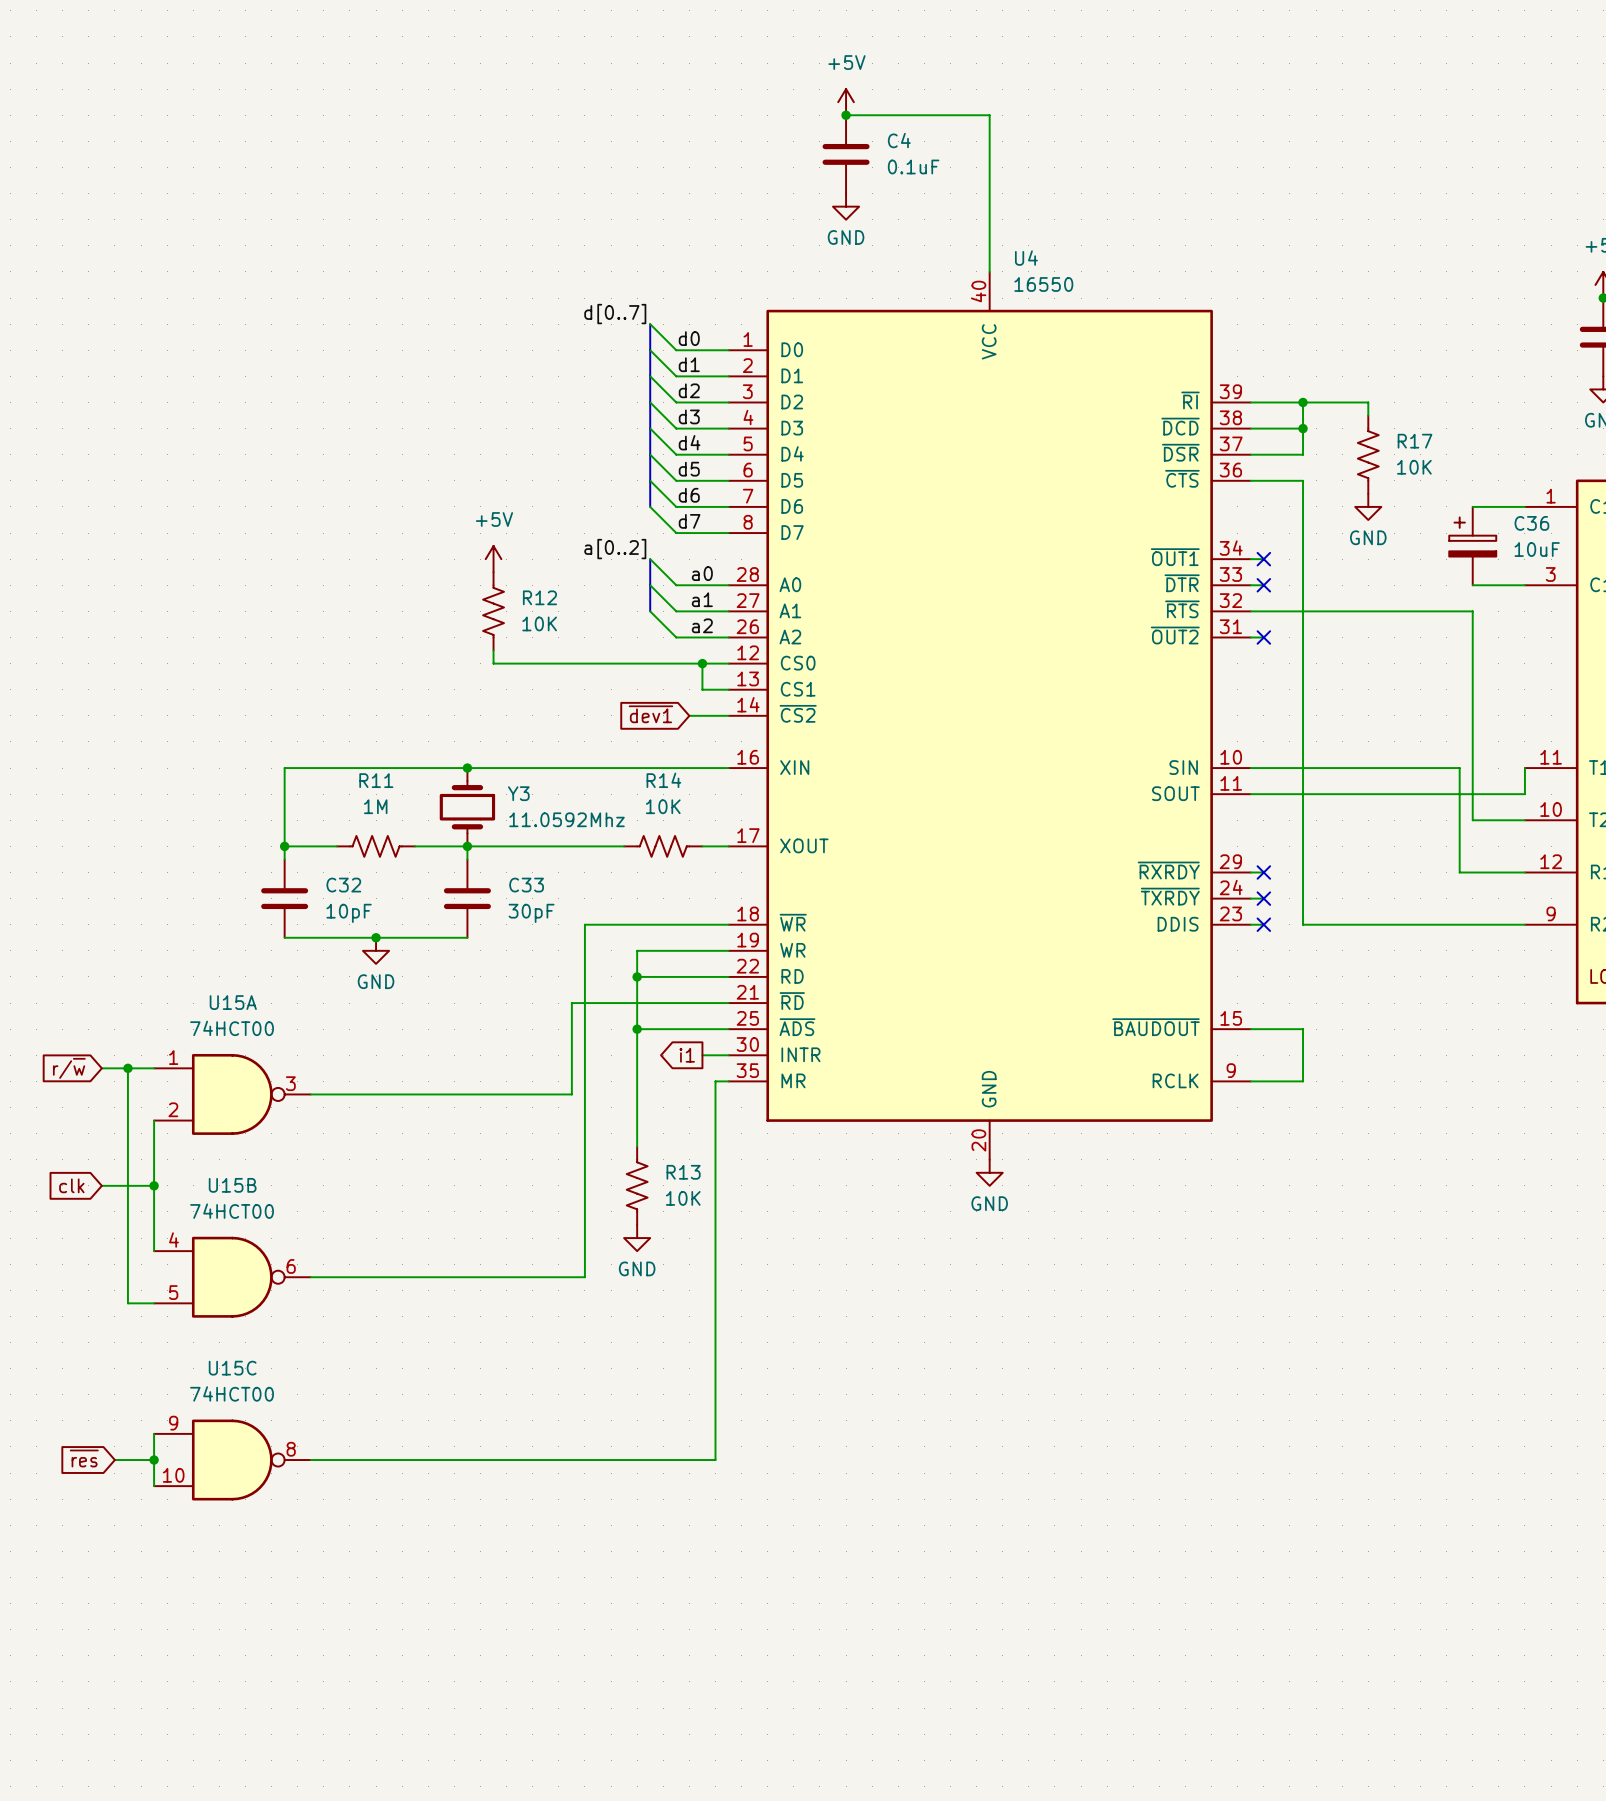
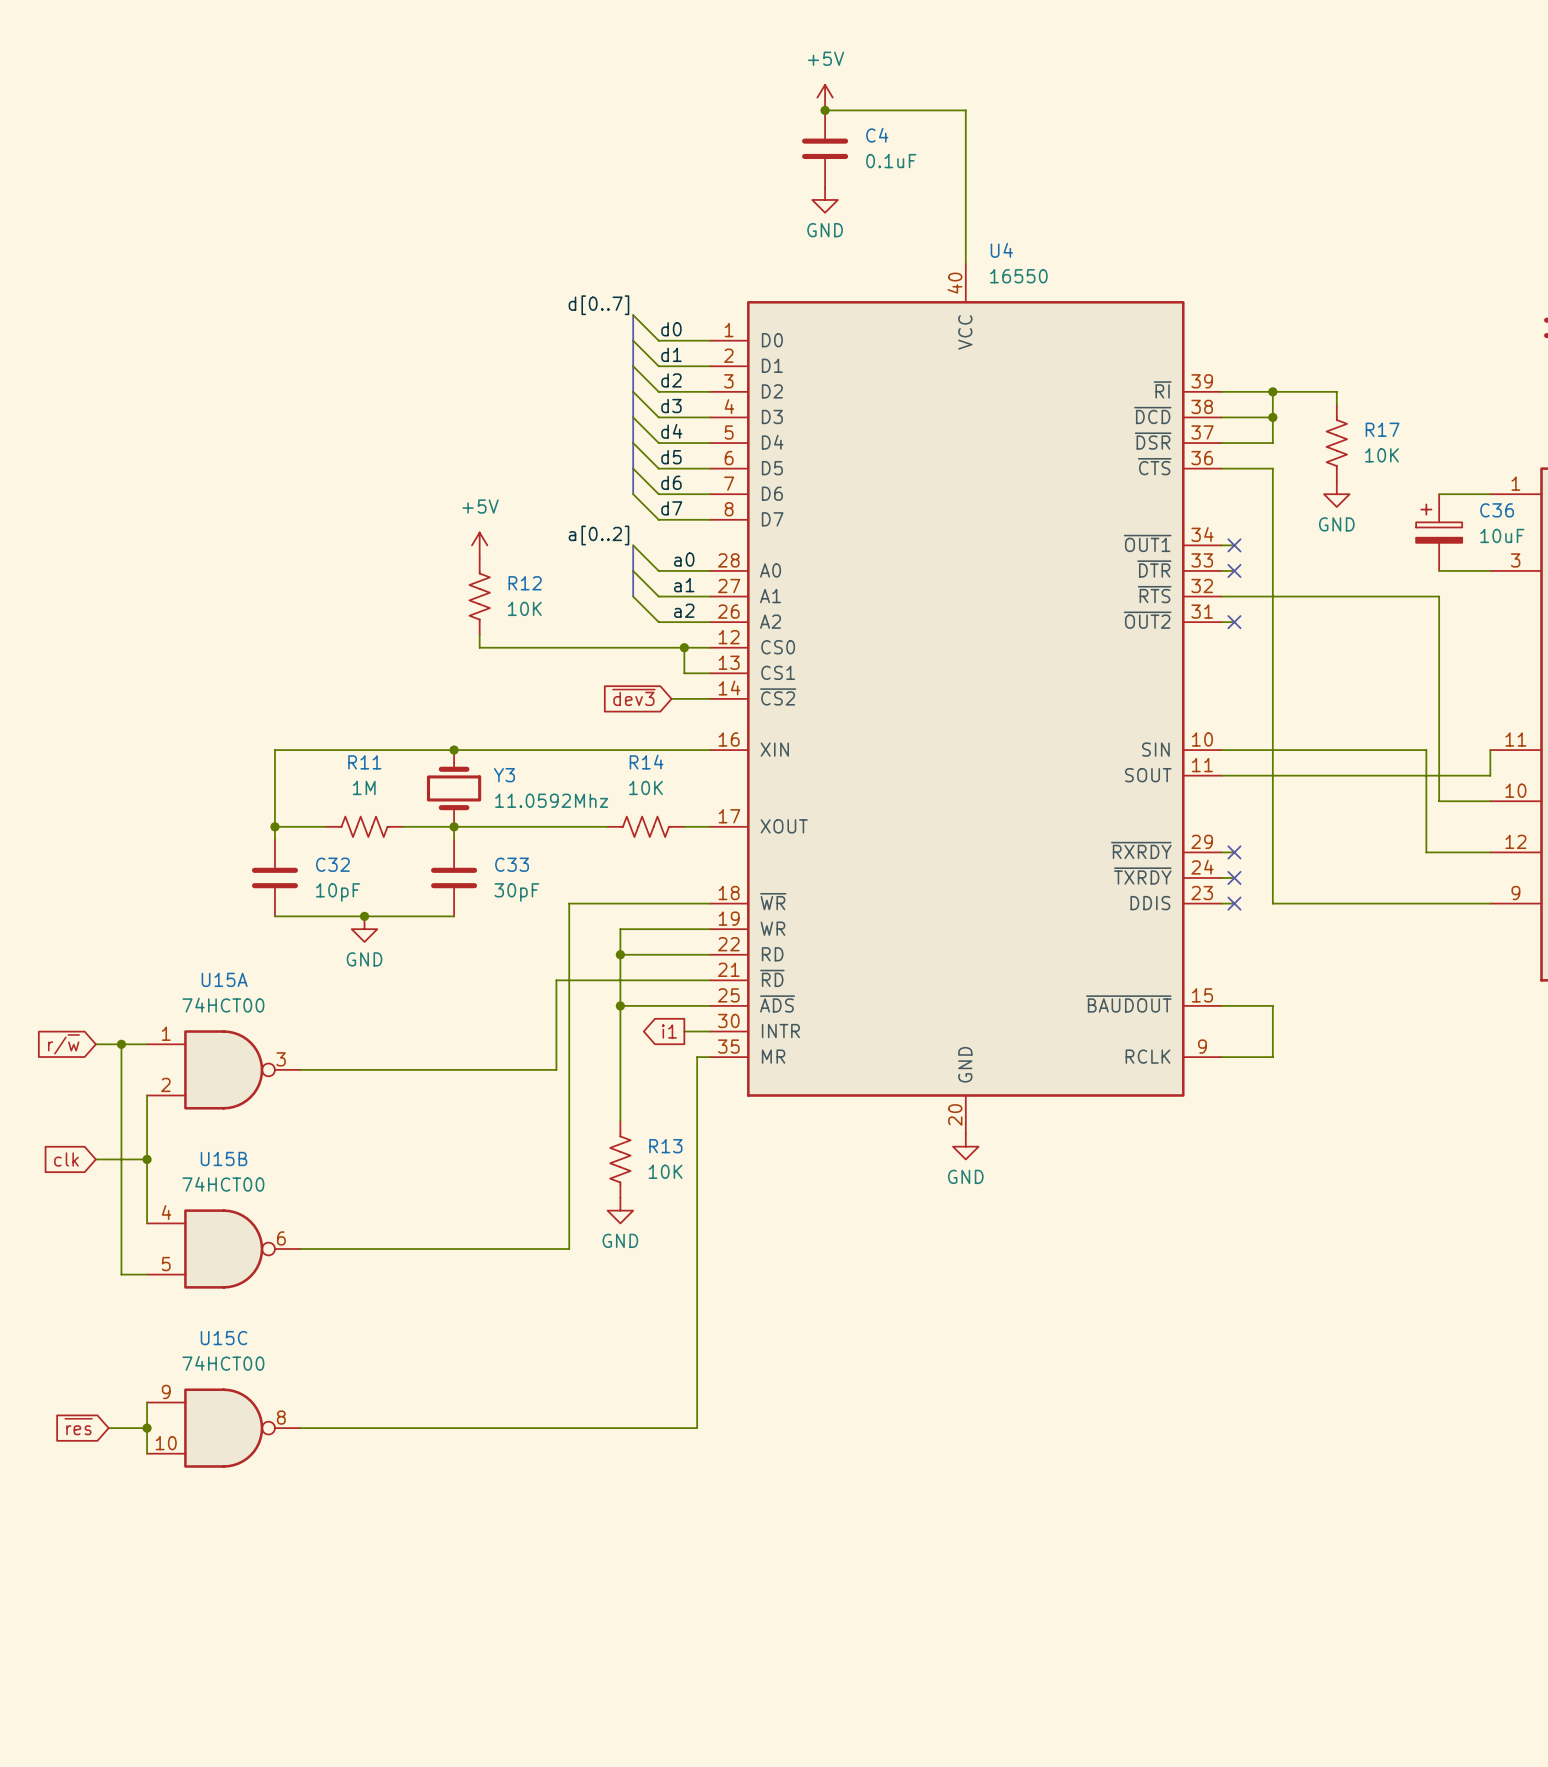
global label: ~{dev1} (650, 714) -> ~{dev3} (633, 697)

